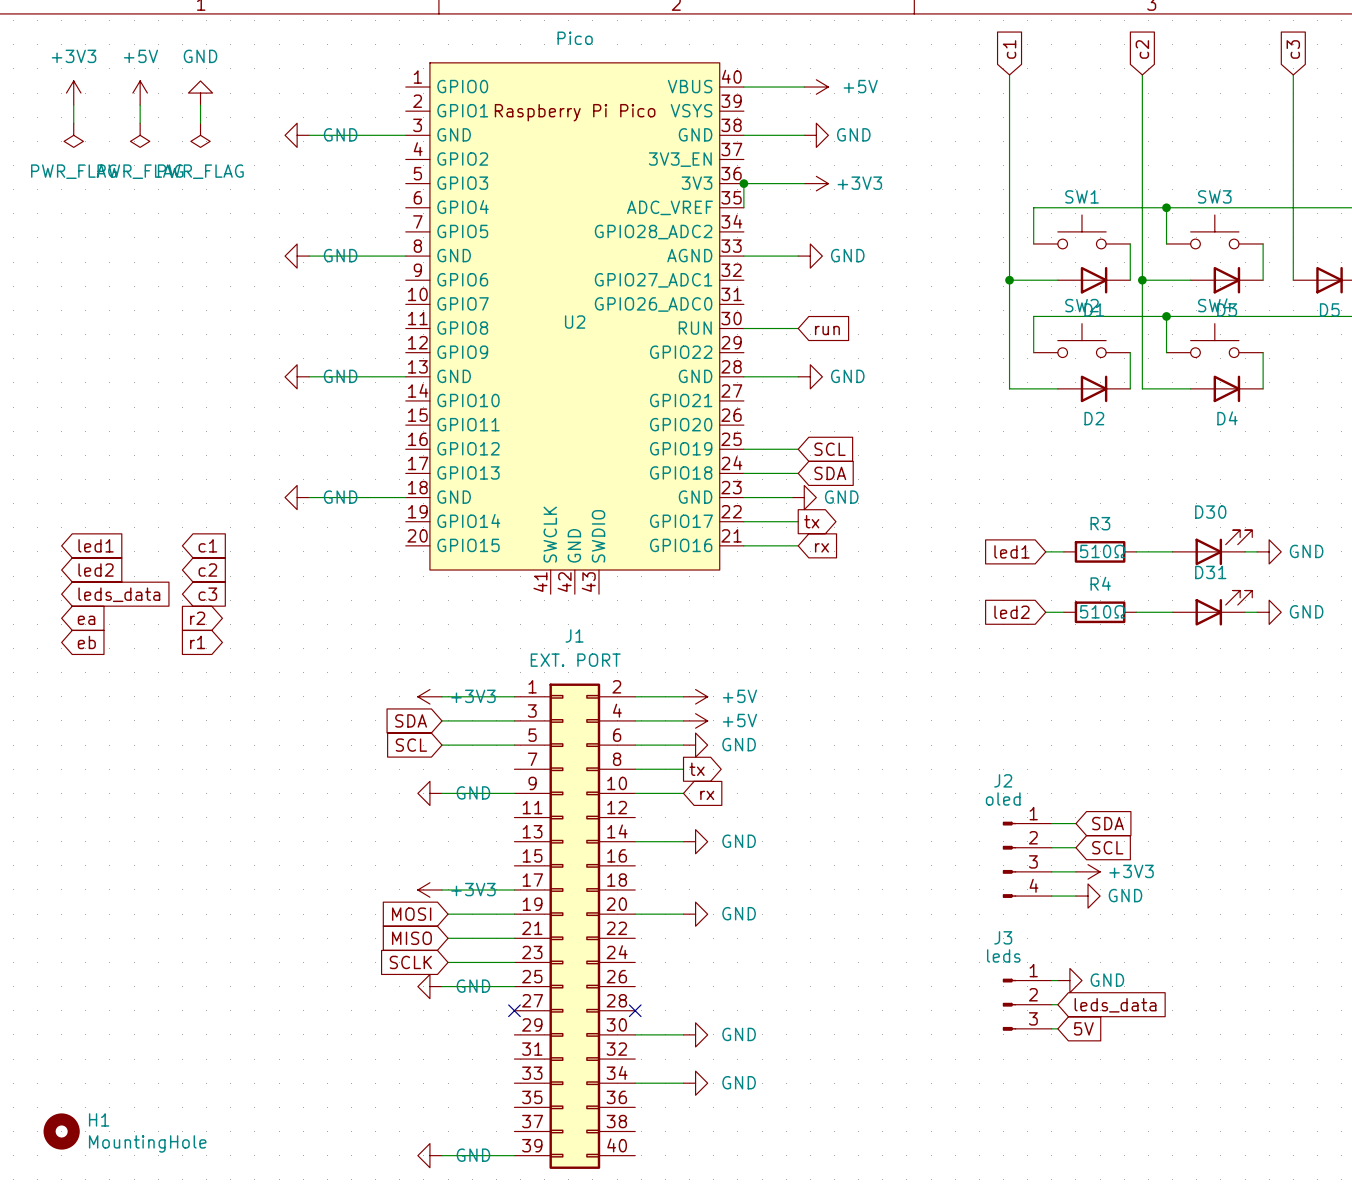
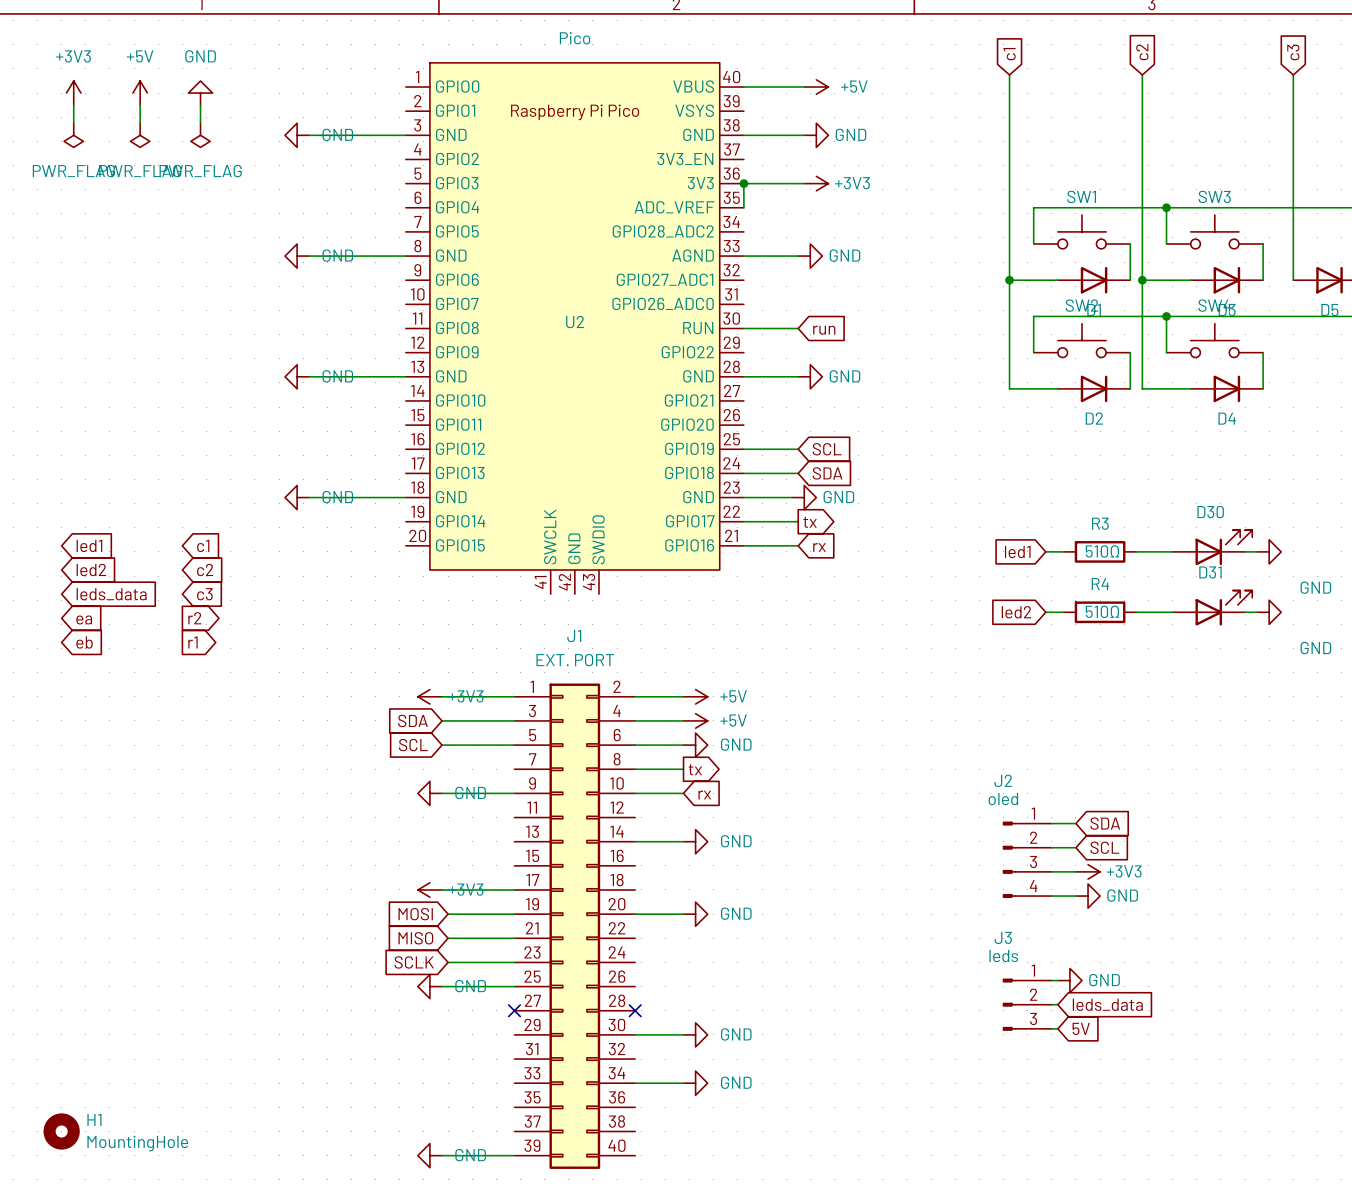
power symbol text position: GND (1306, 551) -> GND (1315, 587)
power symbol text position: GND (1306, 611) -> GND (1315, 648)

